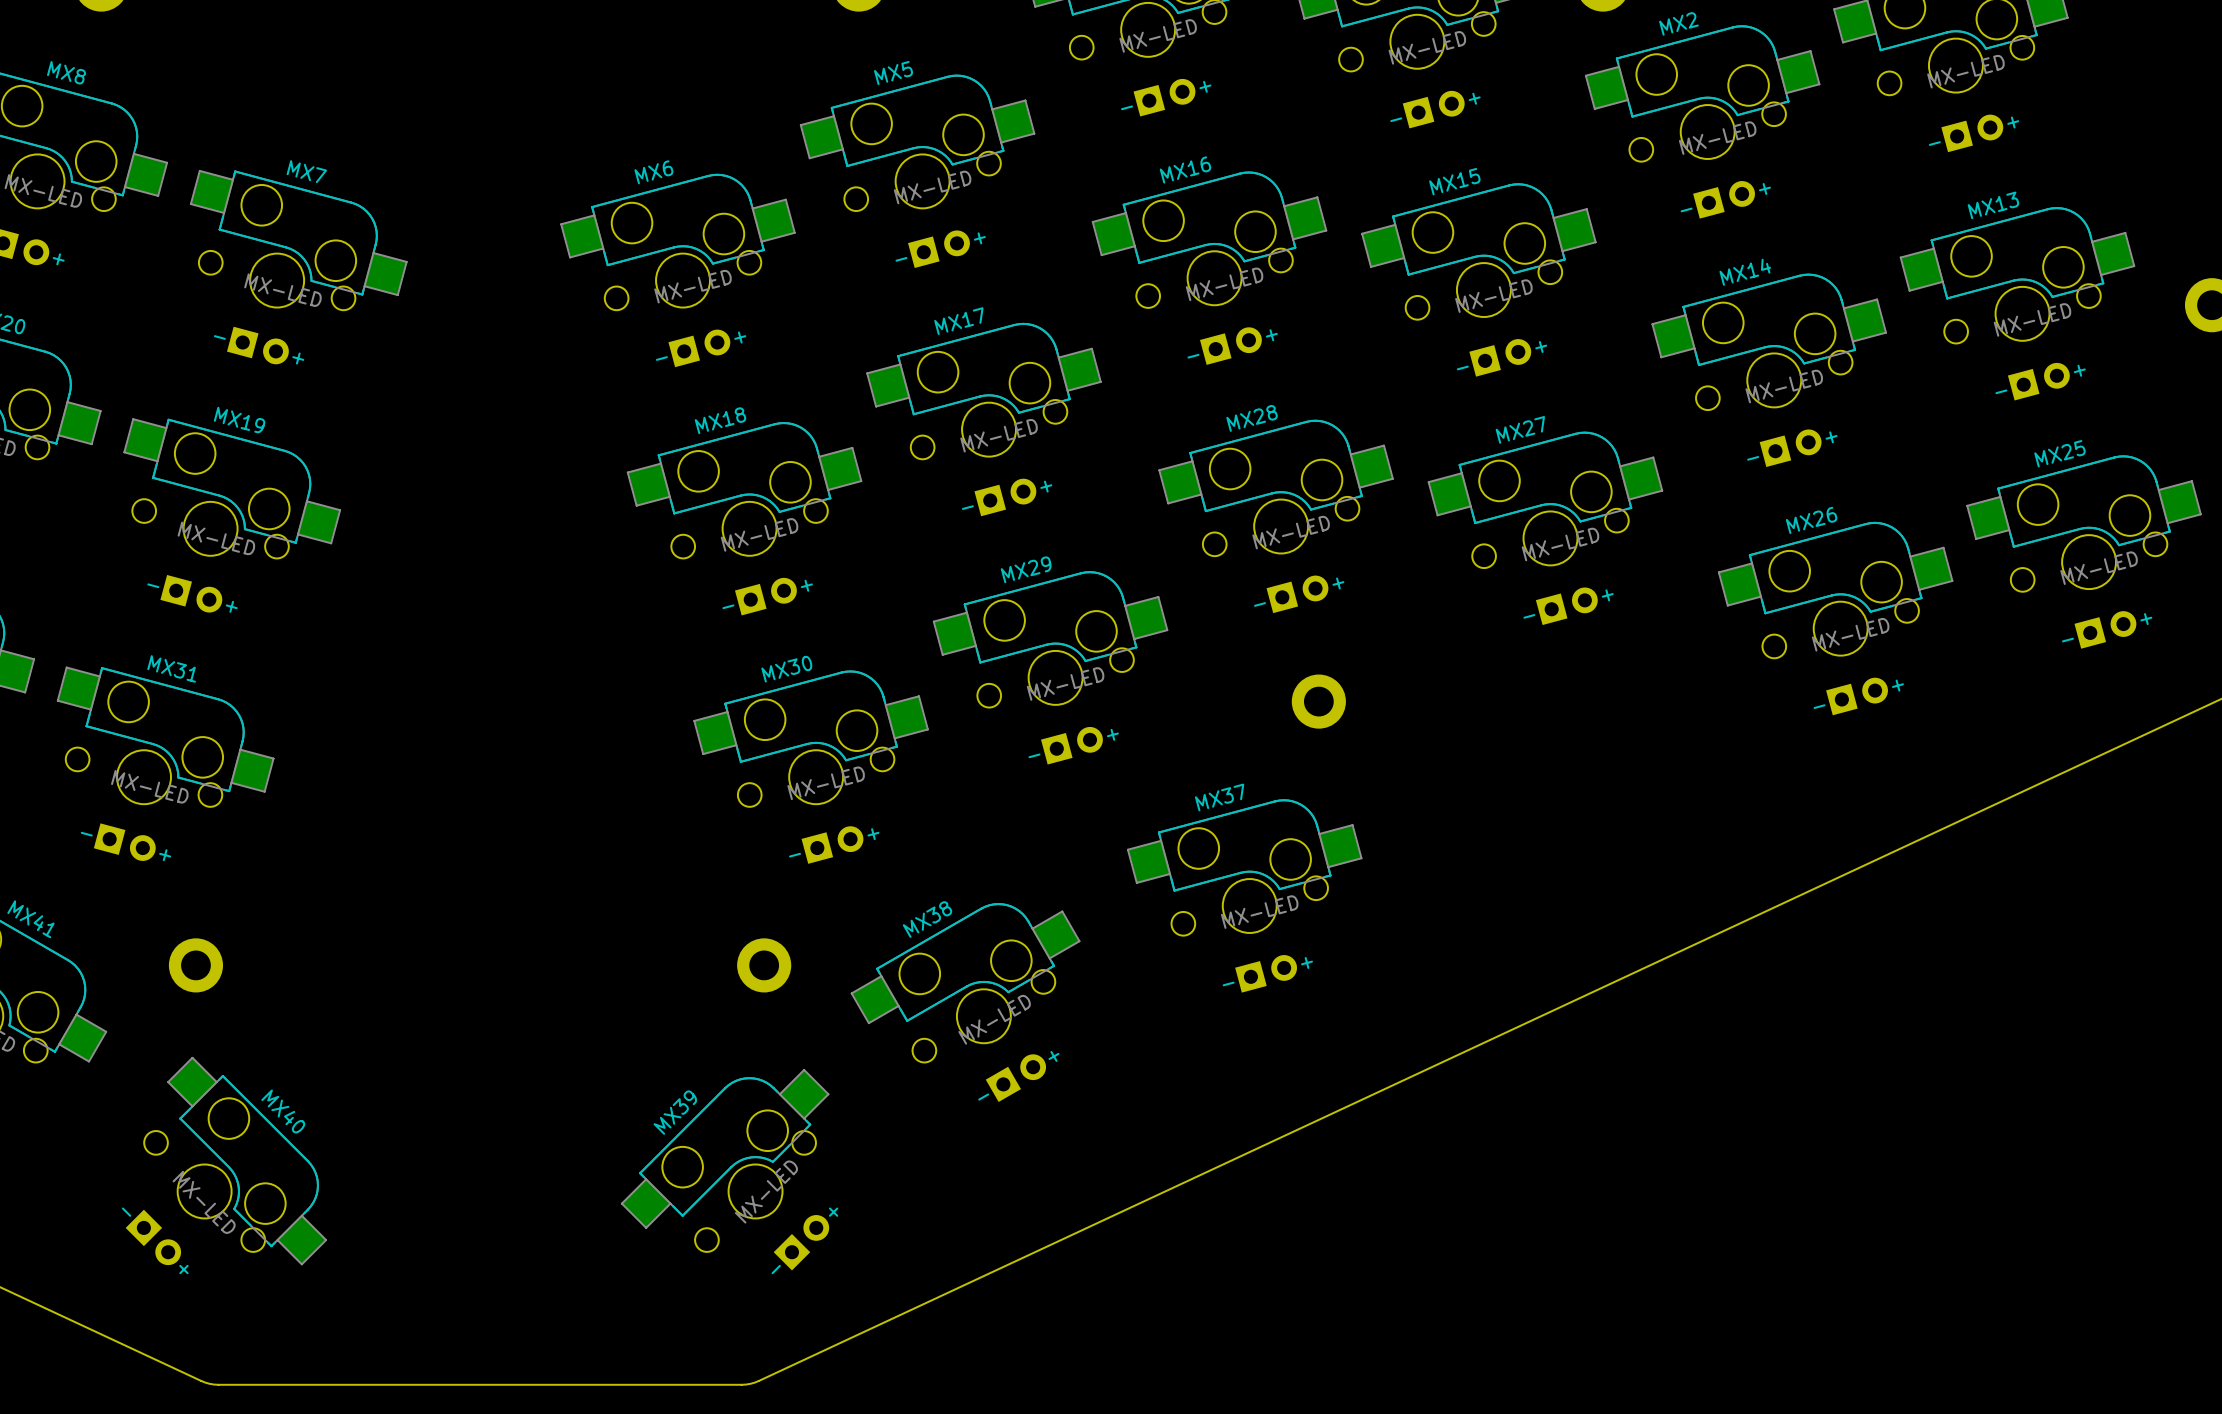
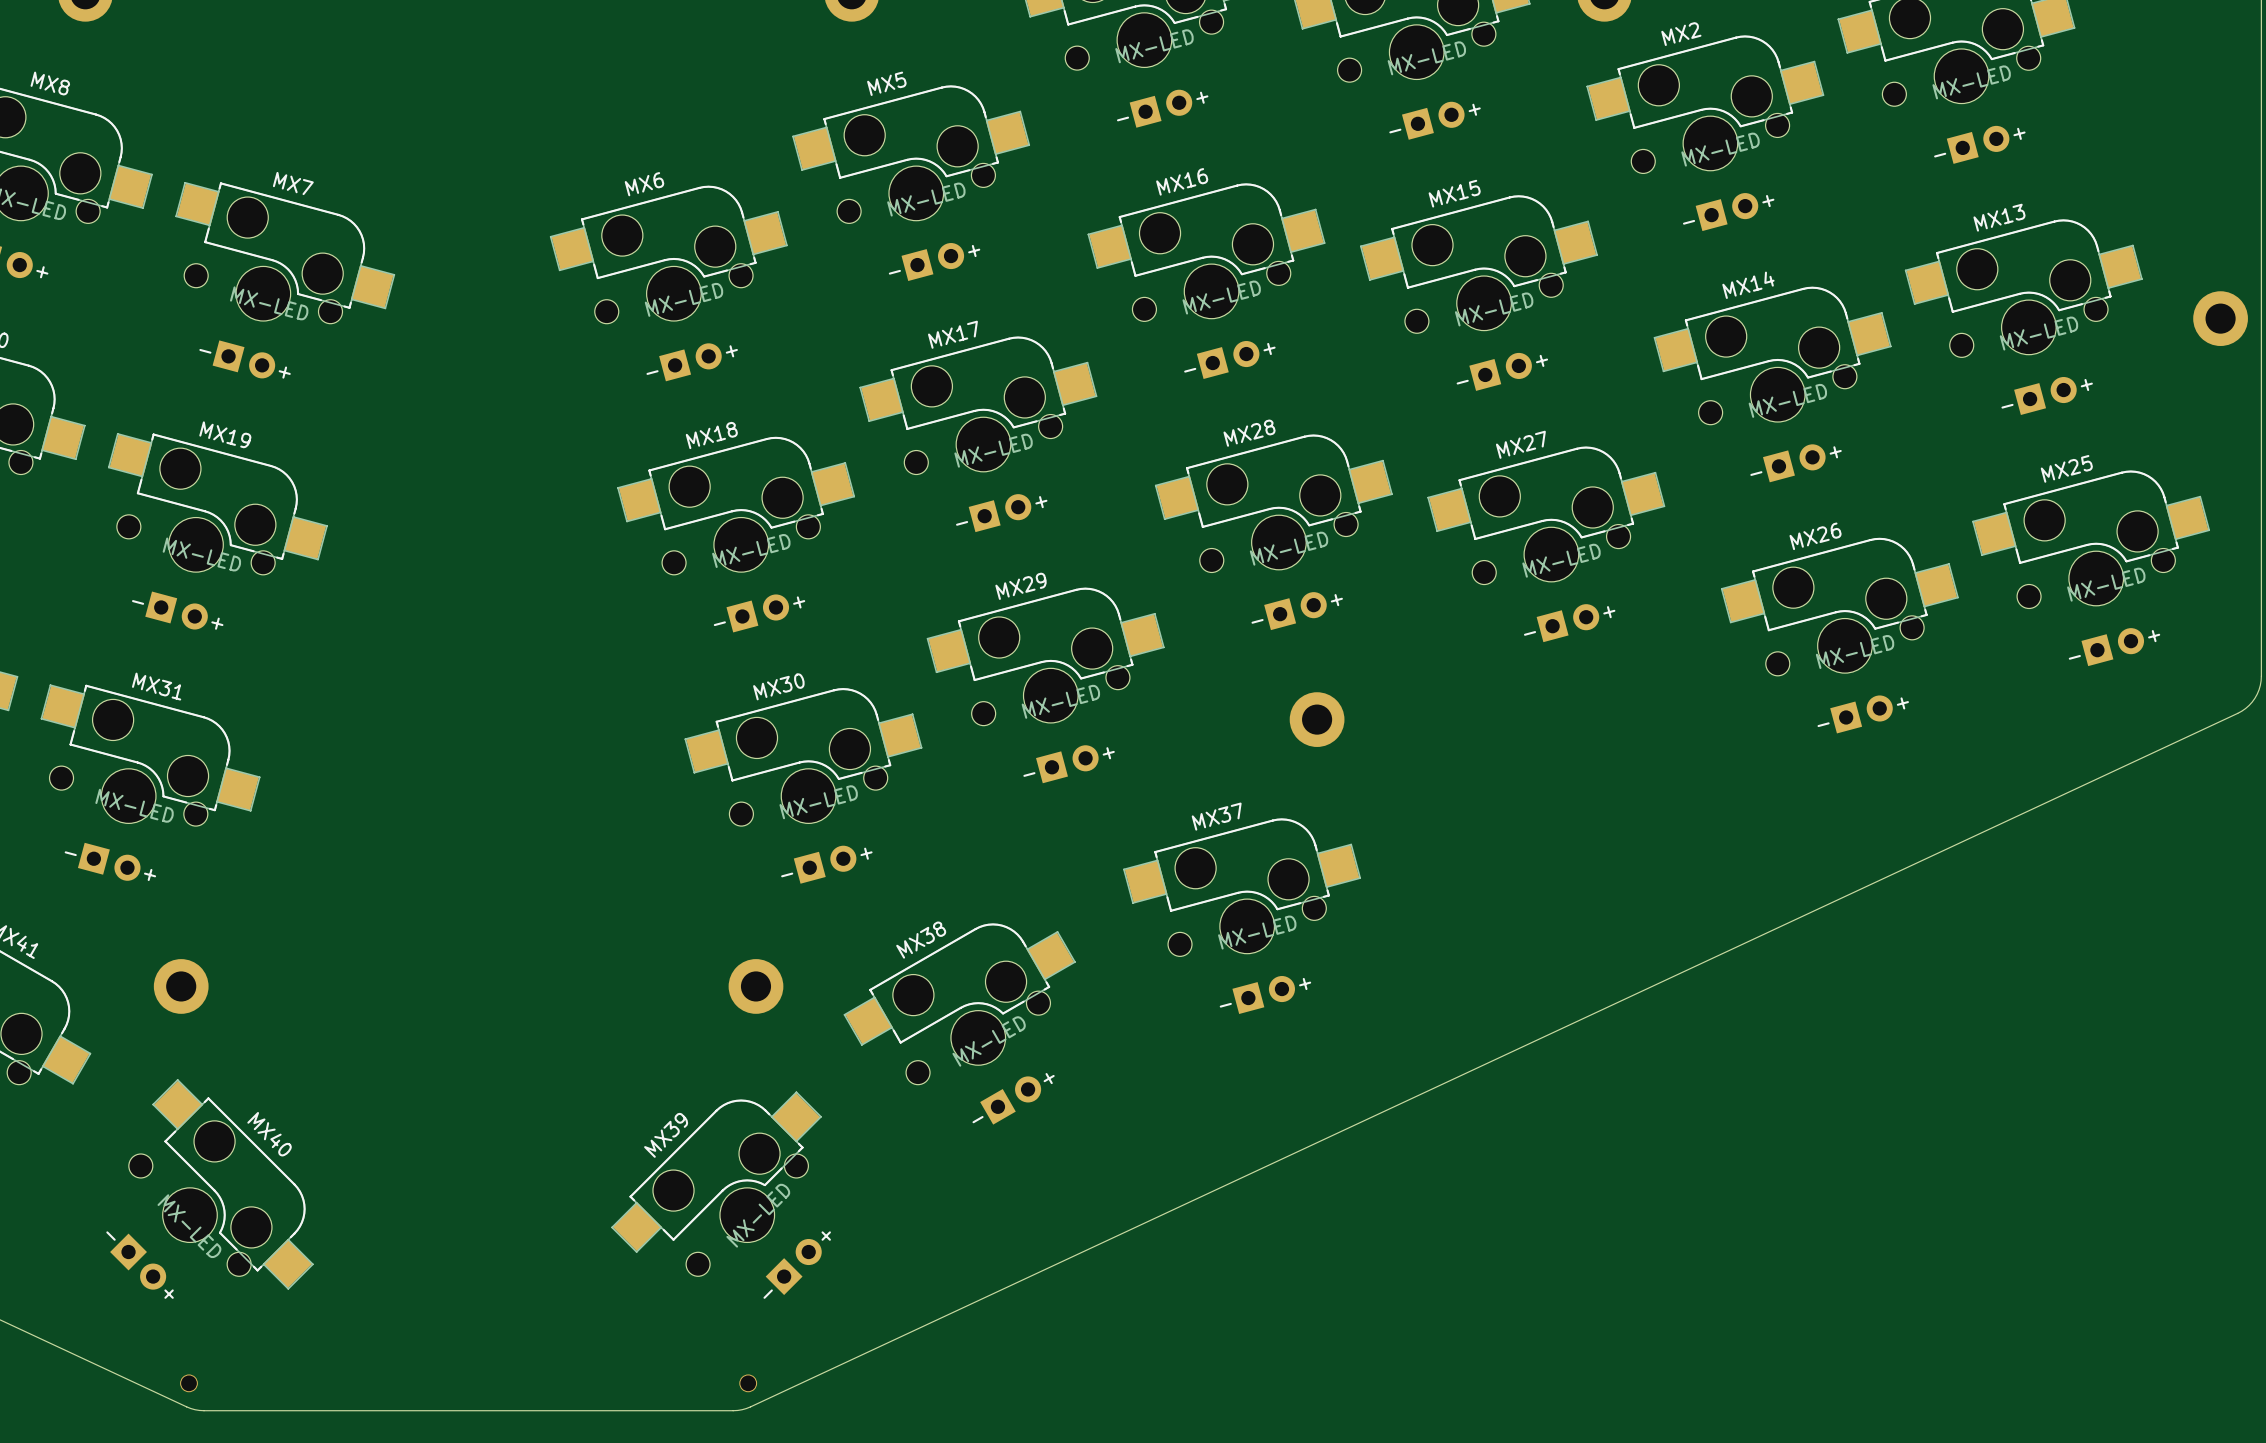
part: none -> (188, 1383)
part: none -> (748, 1383)

